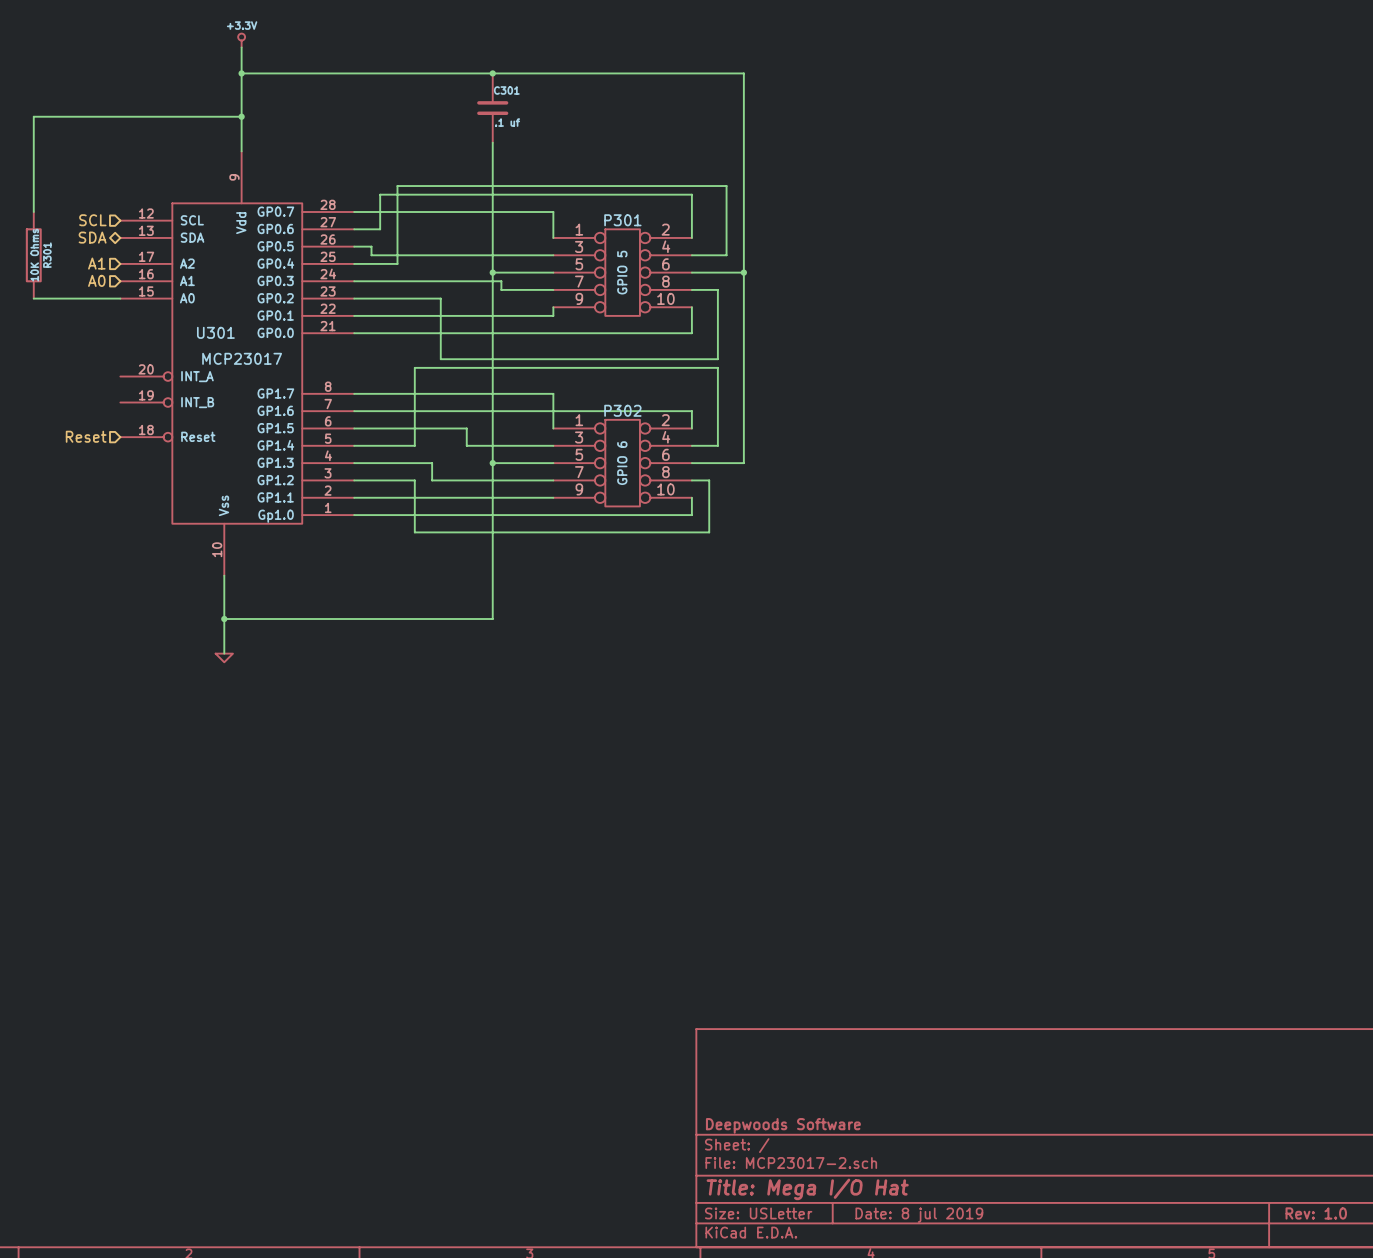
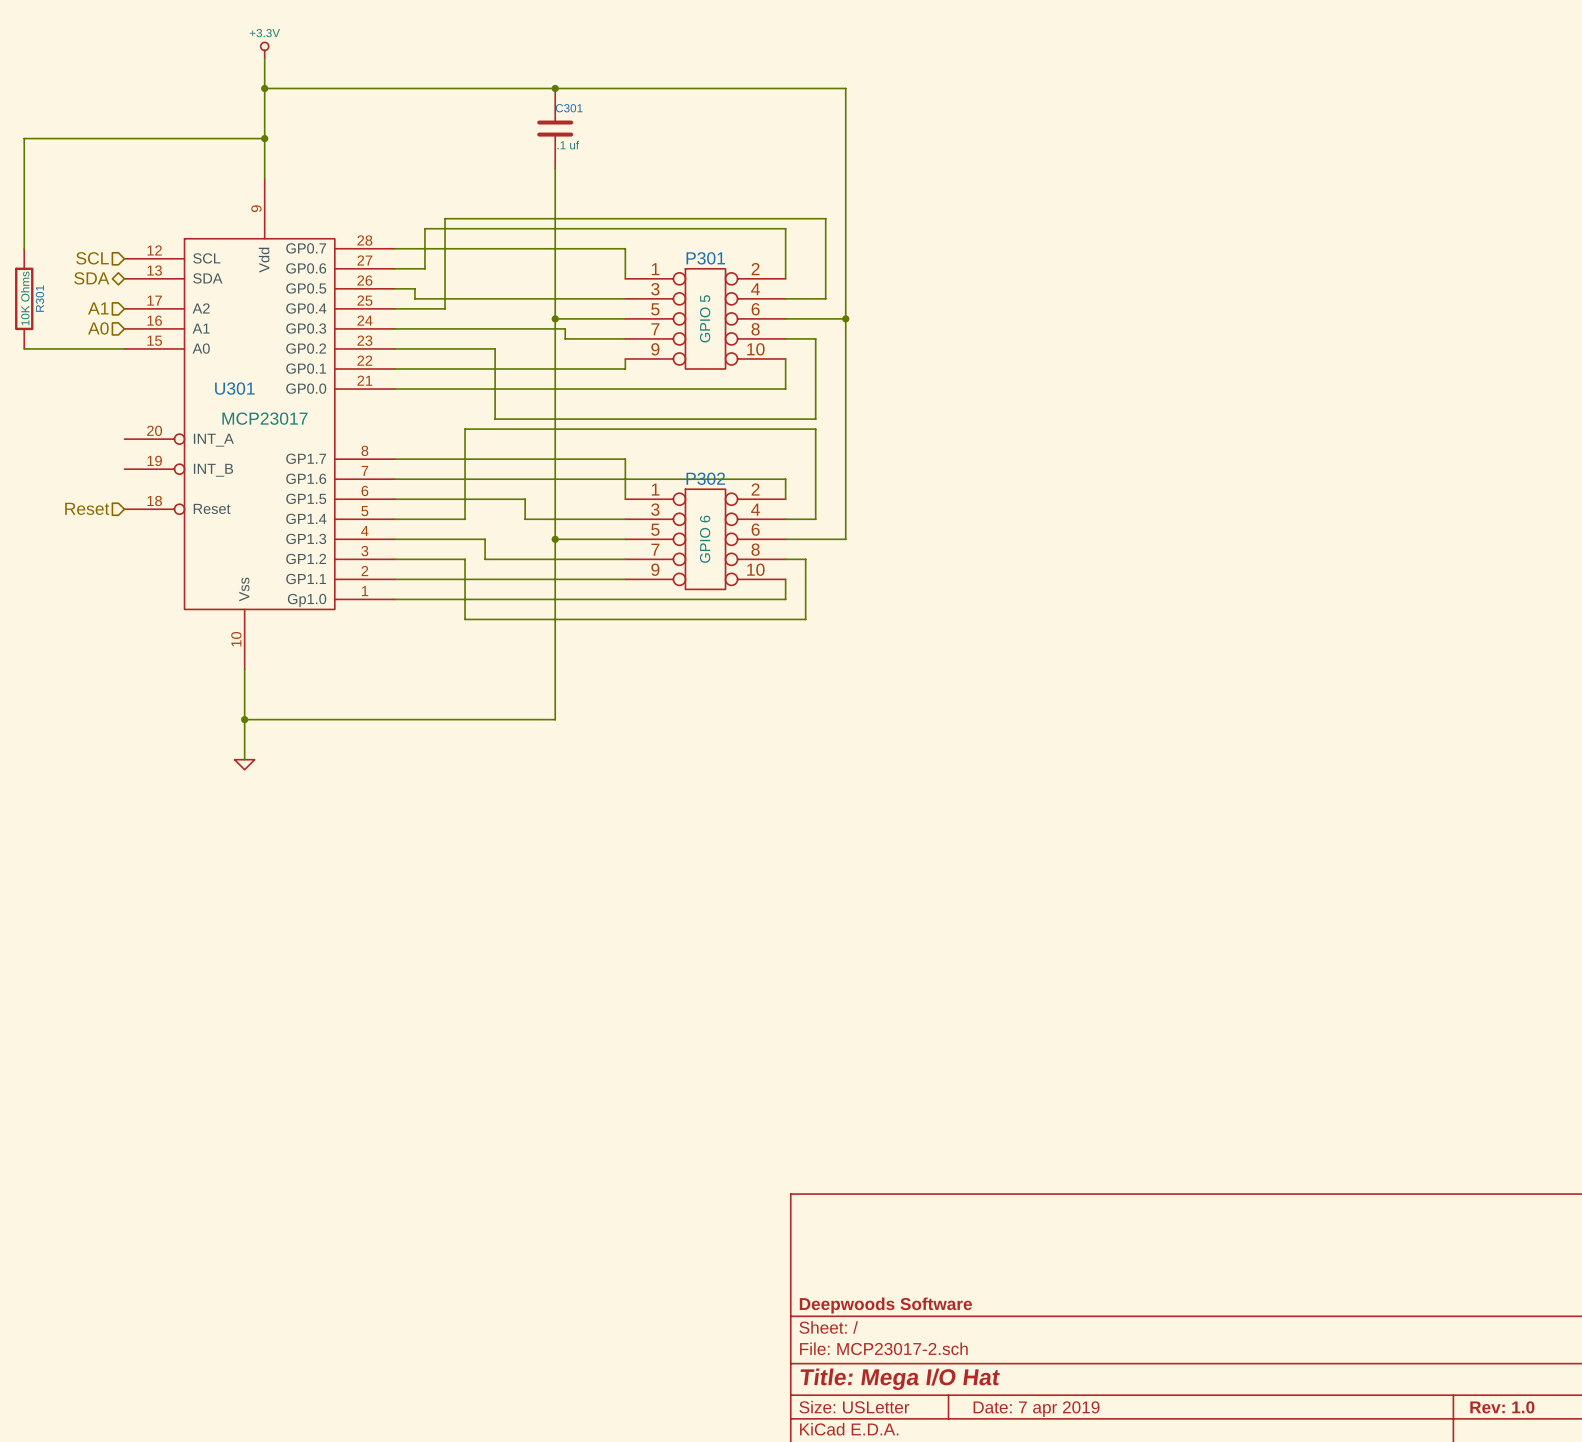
title block: Date: 8 jul 2019 (919, 1215) -> Date: 7 apr 2019 (1036, 1409)

